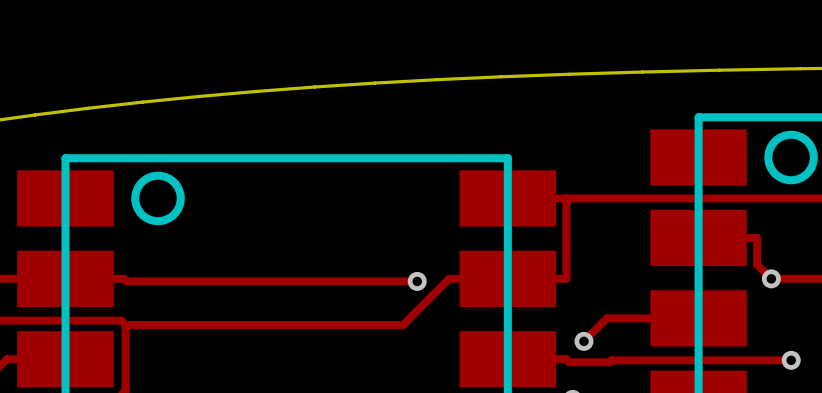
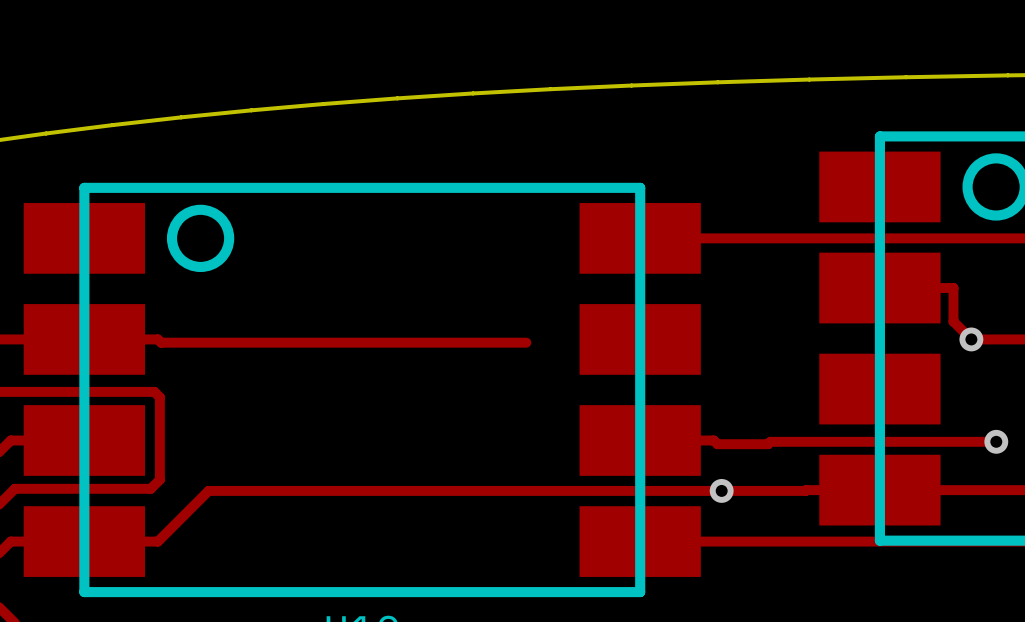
track: (566, 198) (566, 278) (449, 278) (403, 324) (125, 324) -> none
via: (417, 281) -> none
track: (698, 318) (606, 318) (583, 341) -> none
via: (583, 341) -> none

